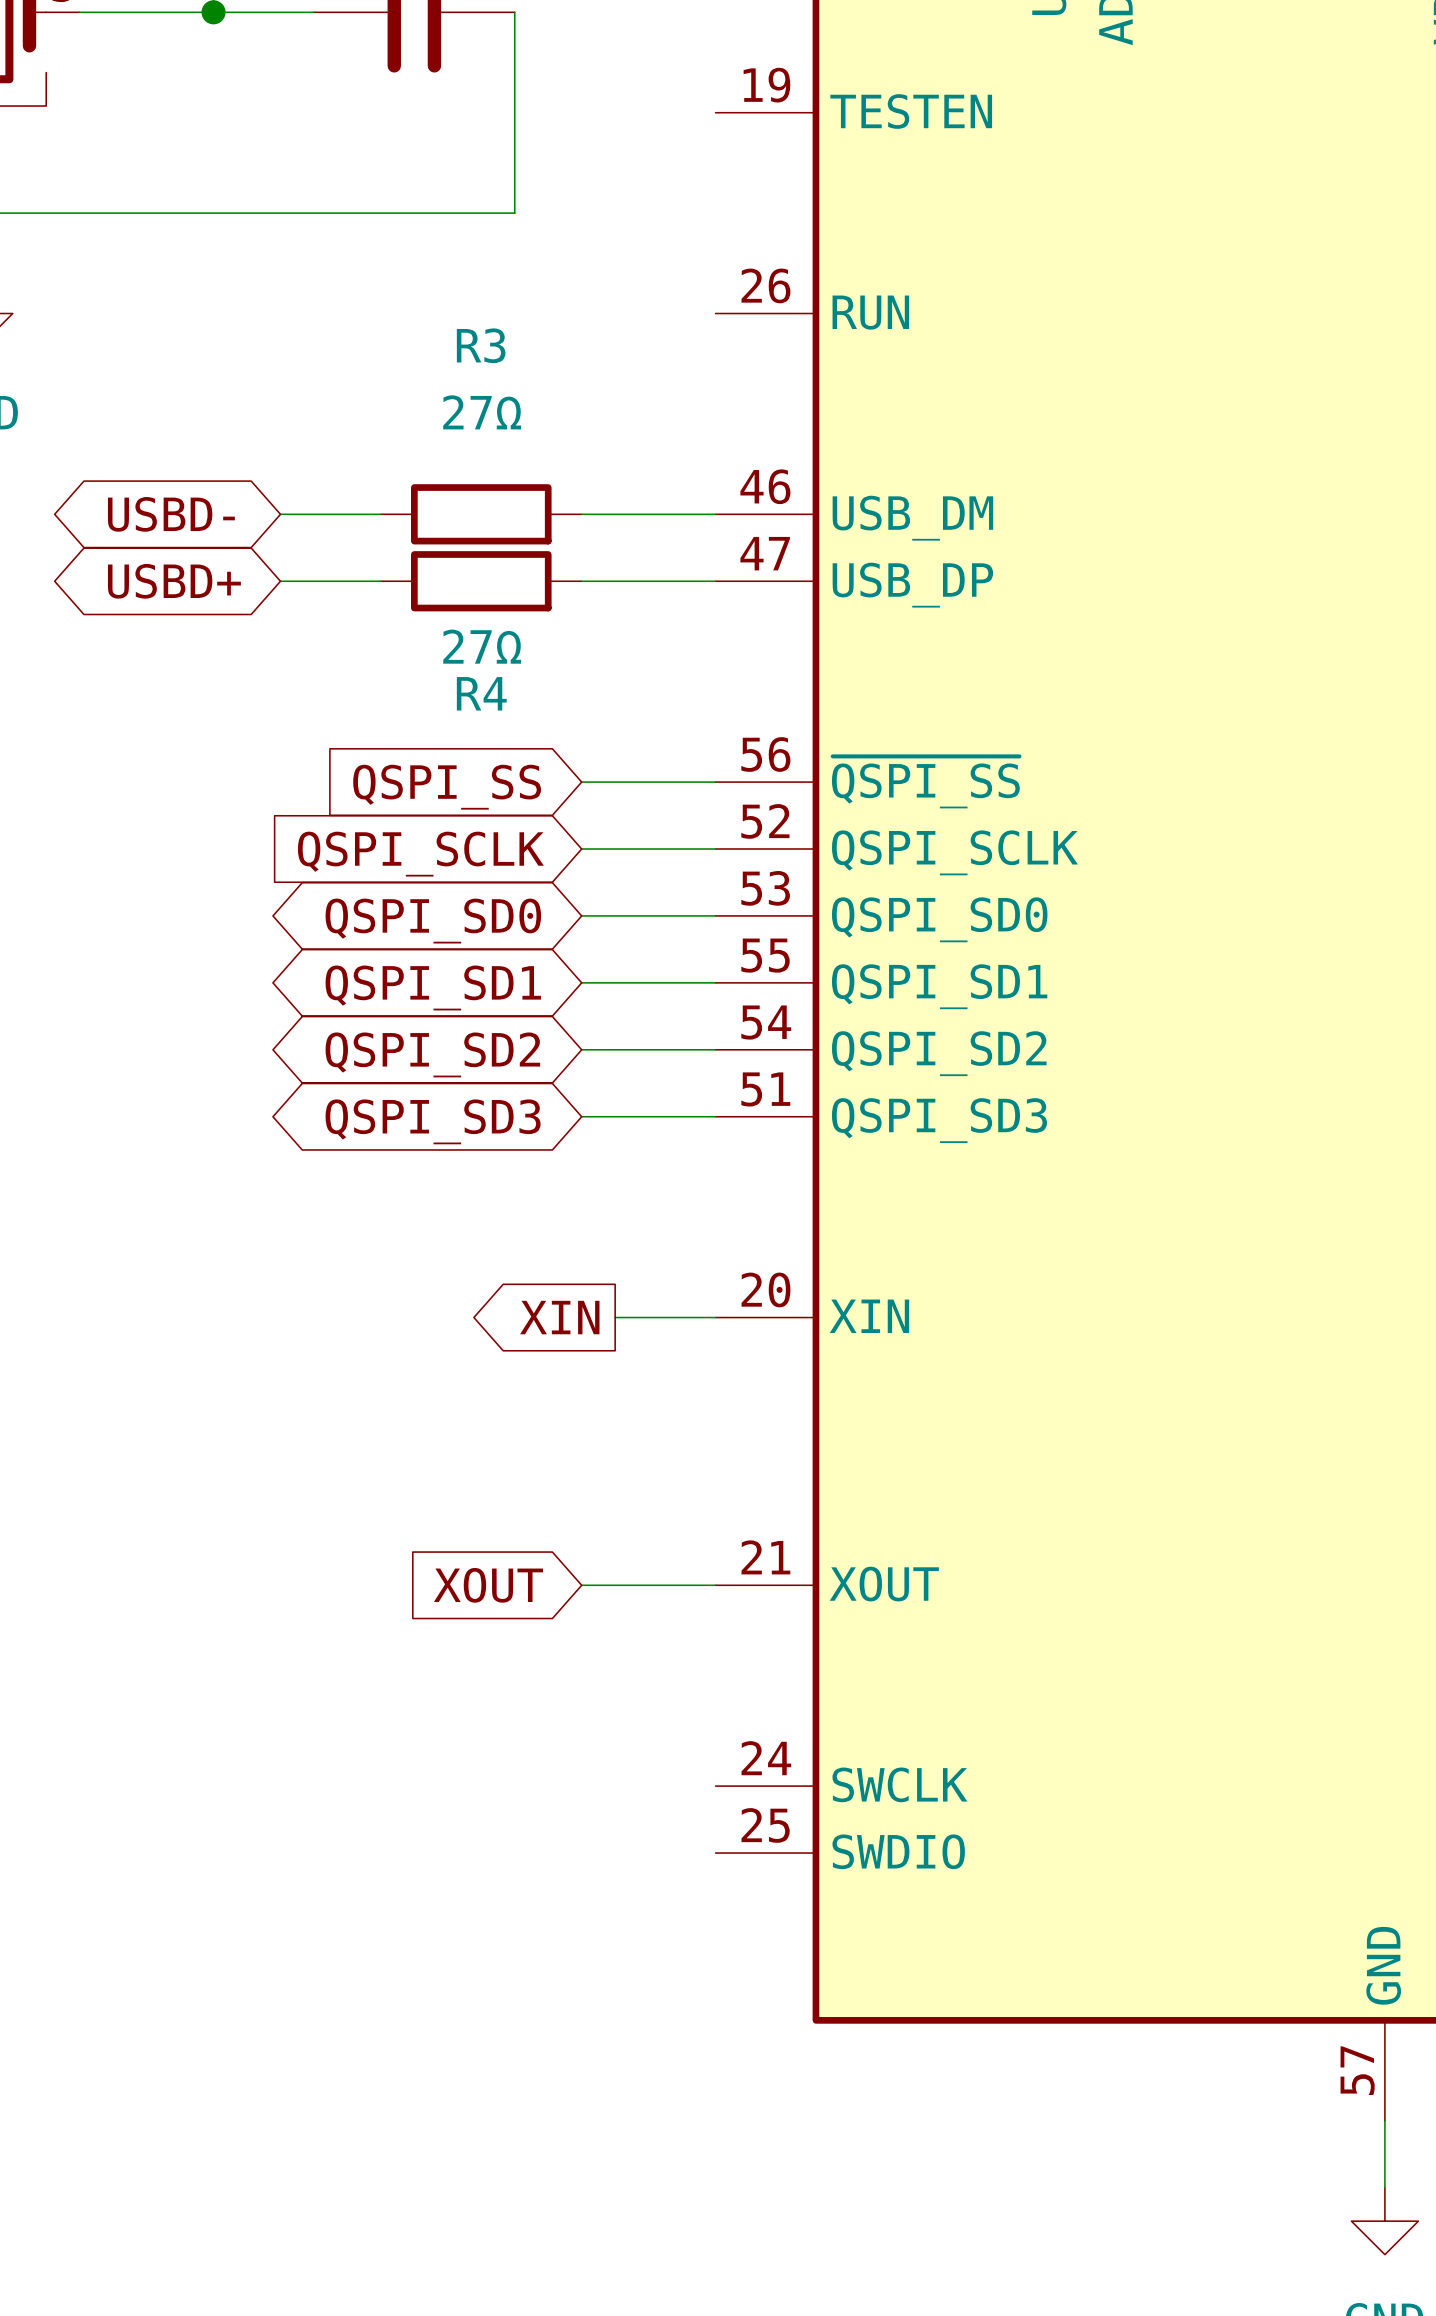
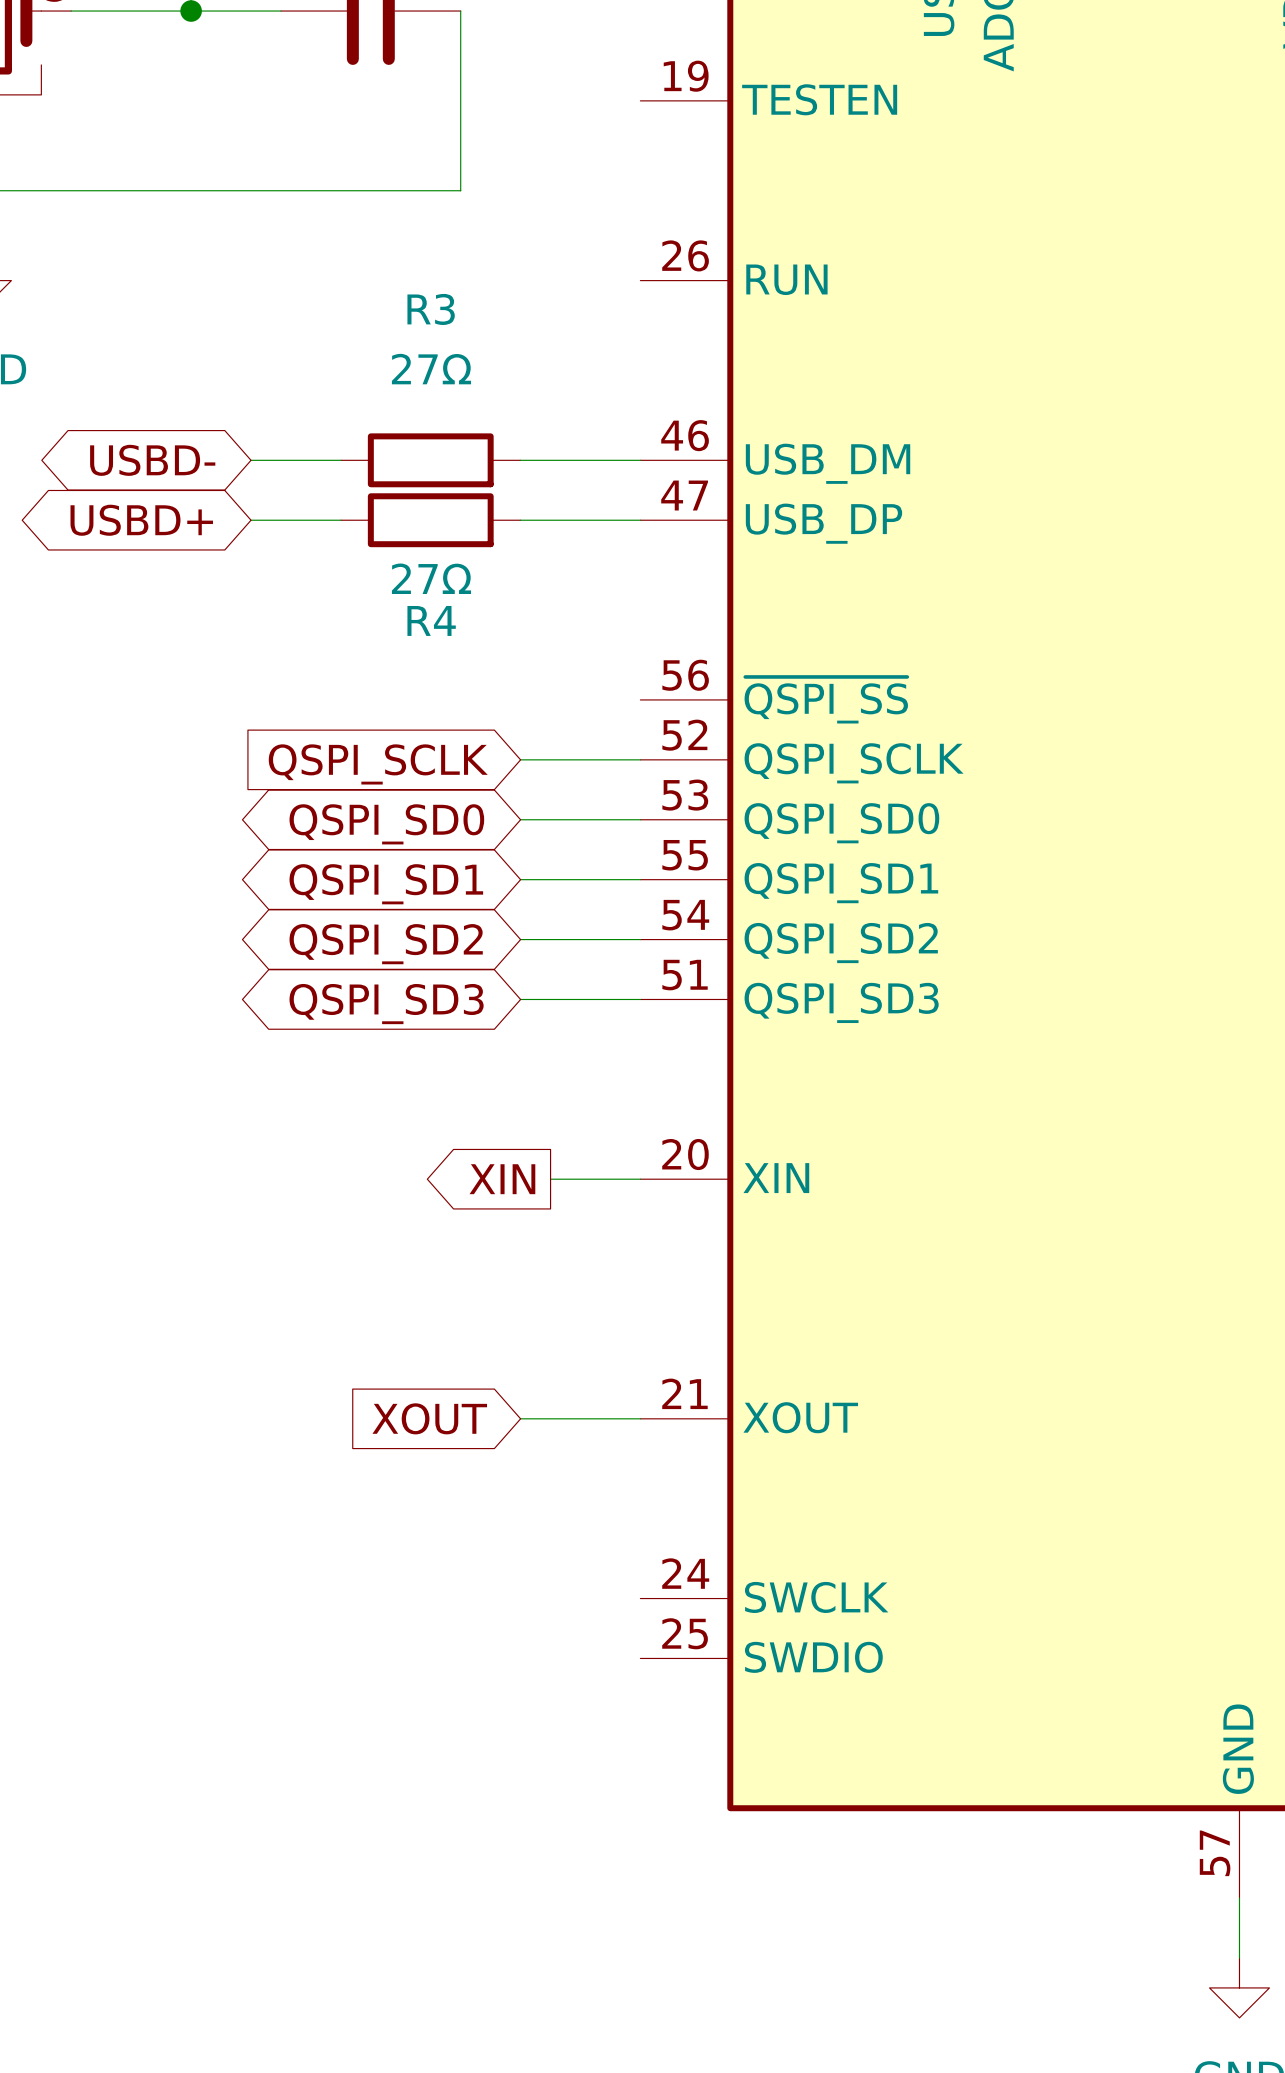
wire: (581, 782) (715, 782) -> none
global label: QSPI_SS (447, 787) -> none

